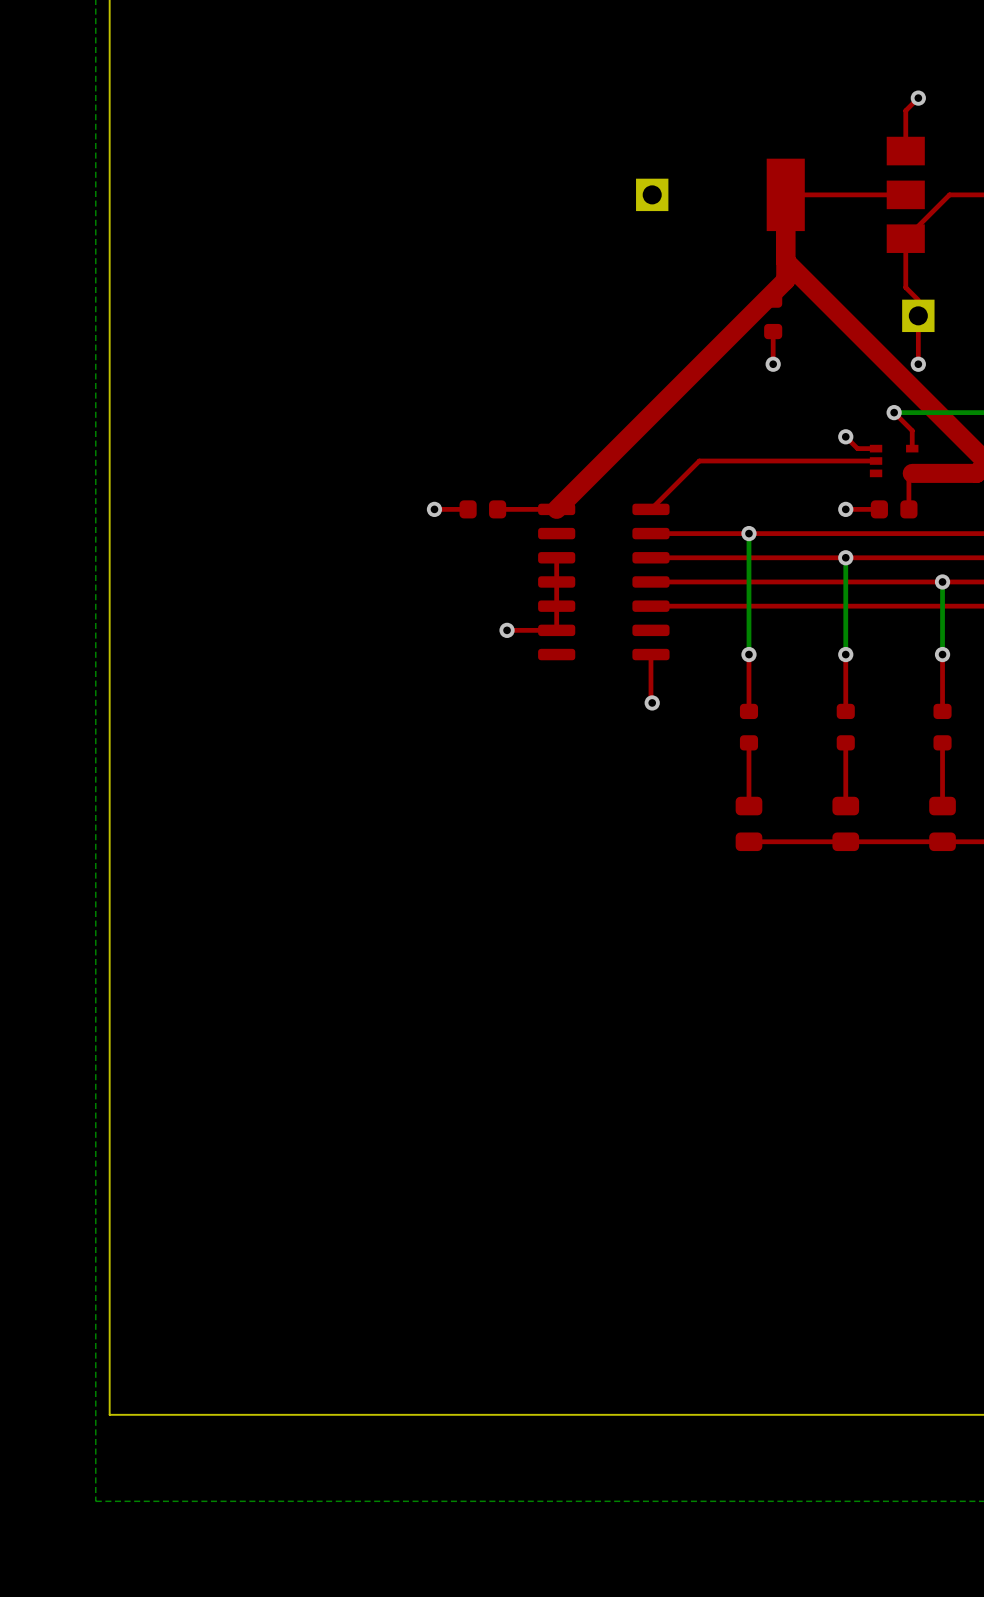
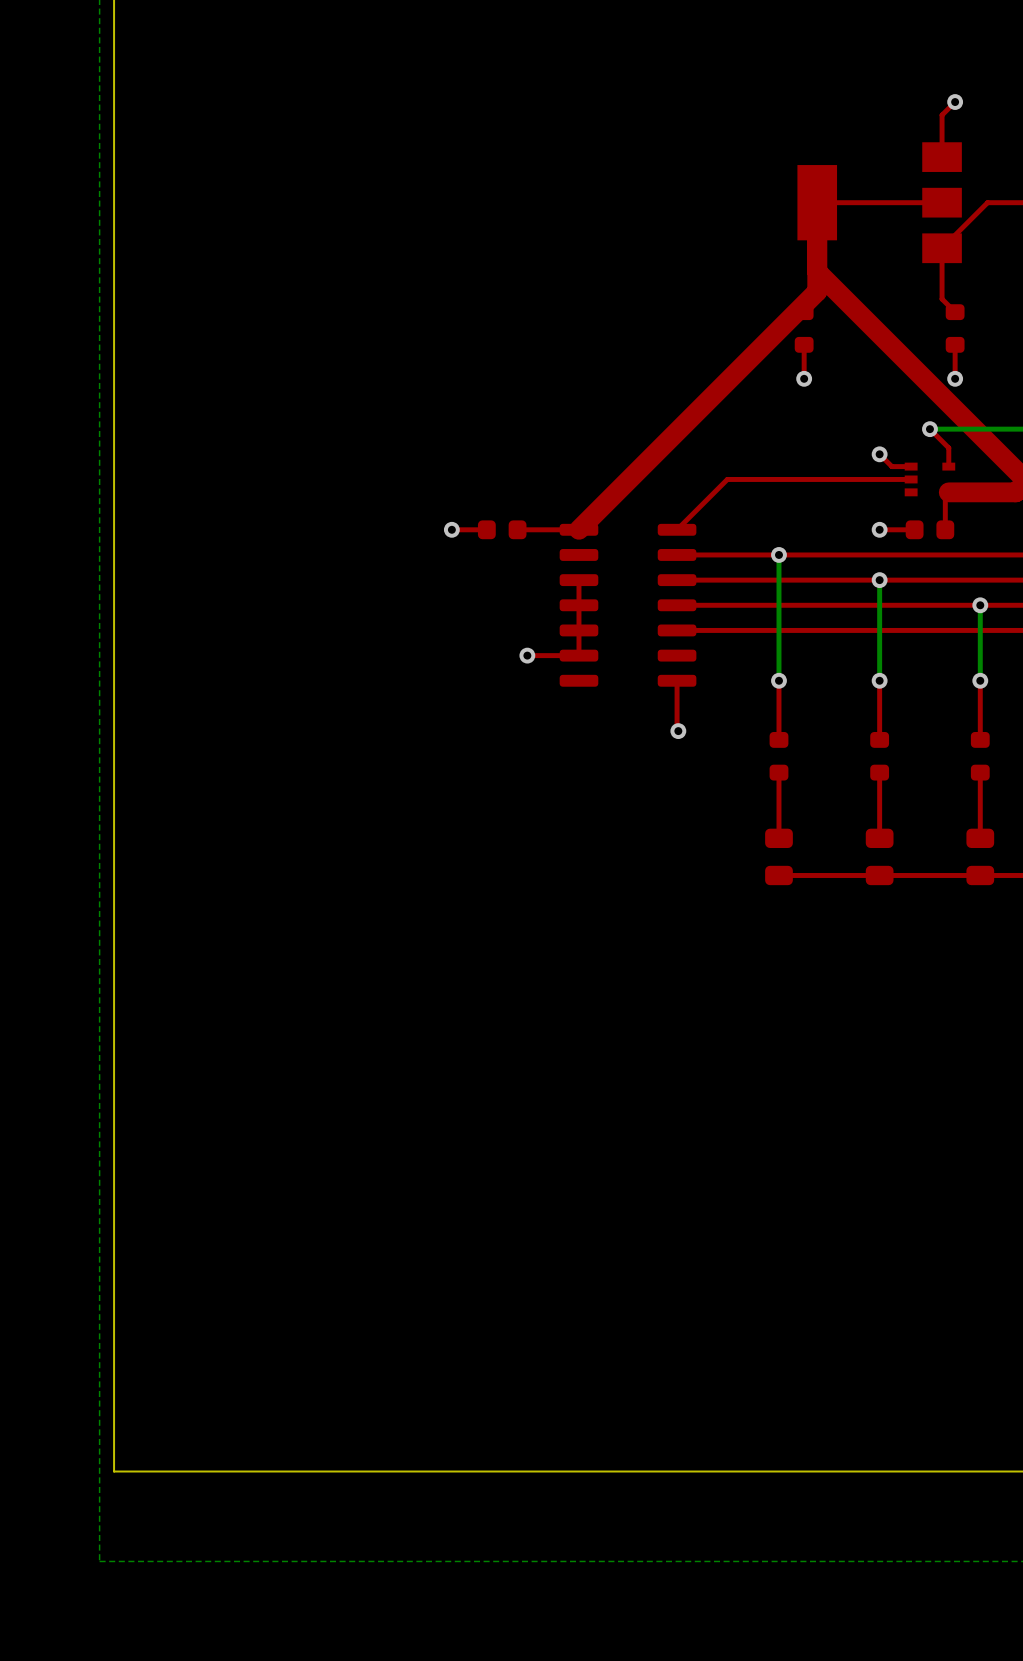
part: (652, 194) -> none
part footprint: [902, 299, 935, 333] -> [945, 304, 965, 353]

